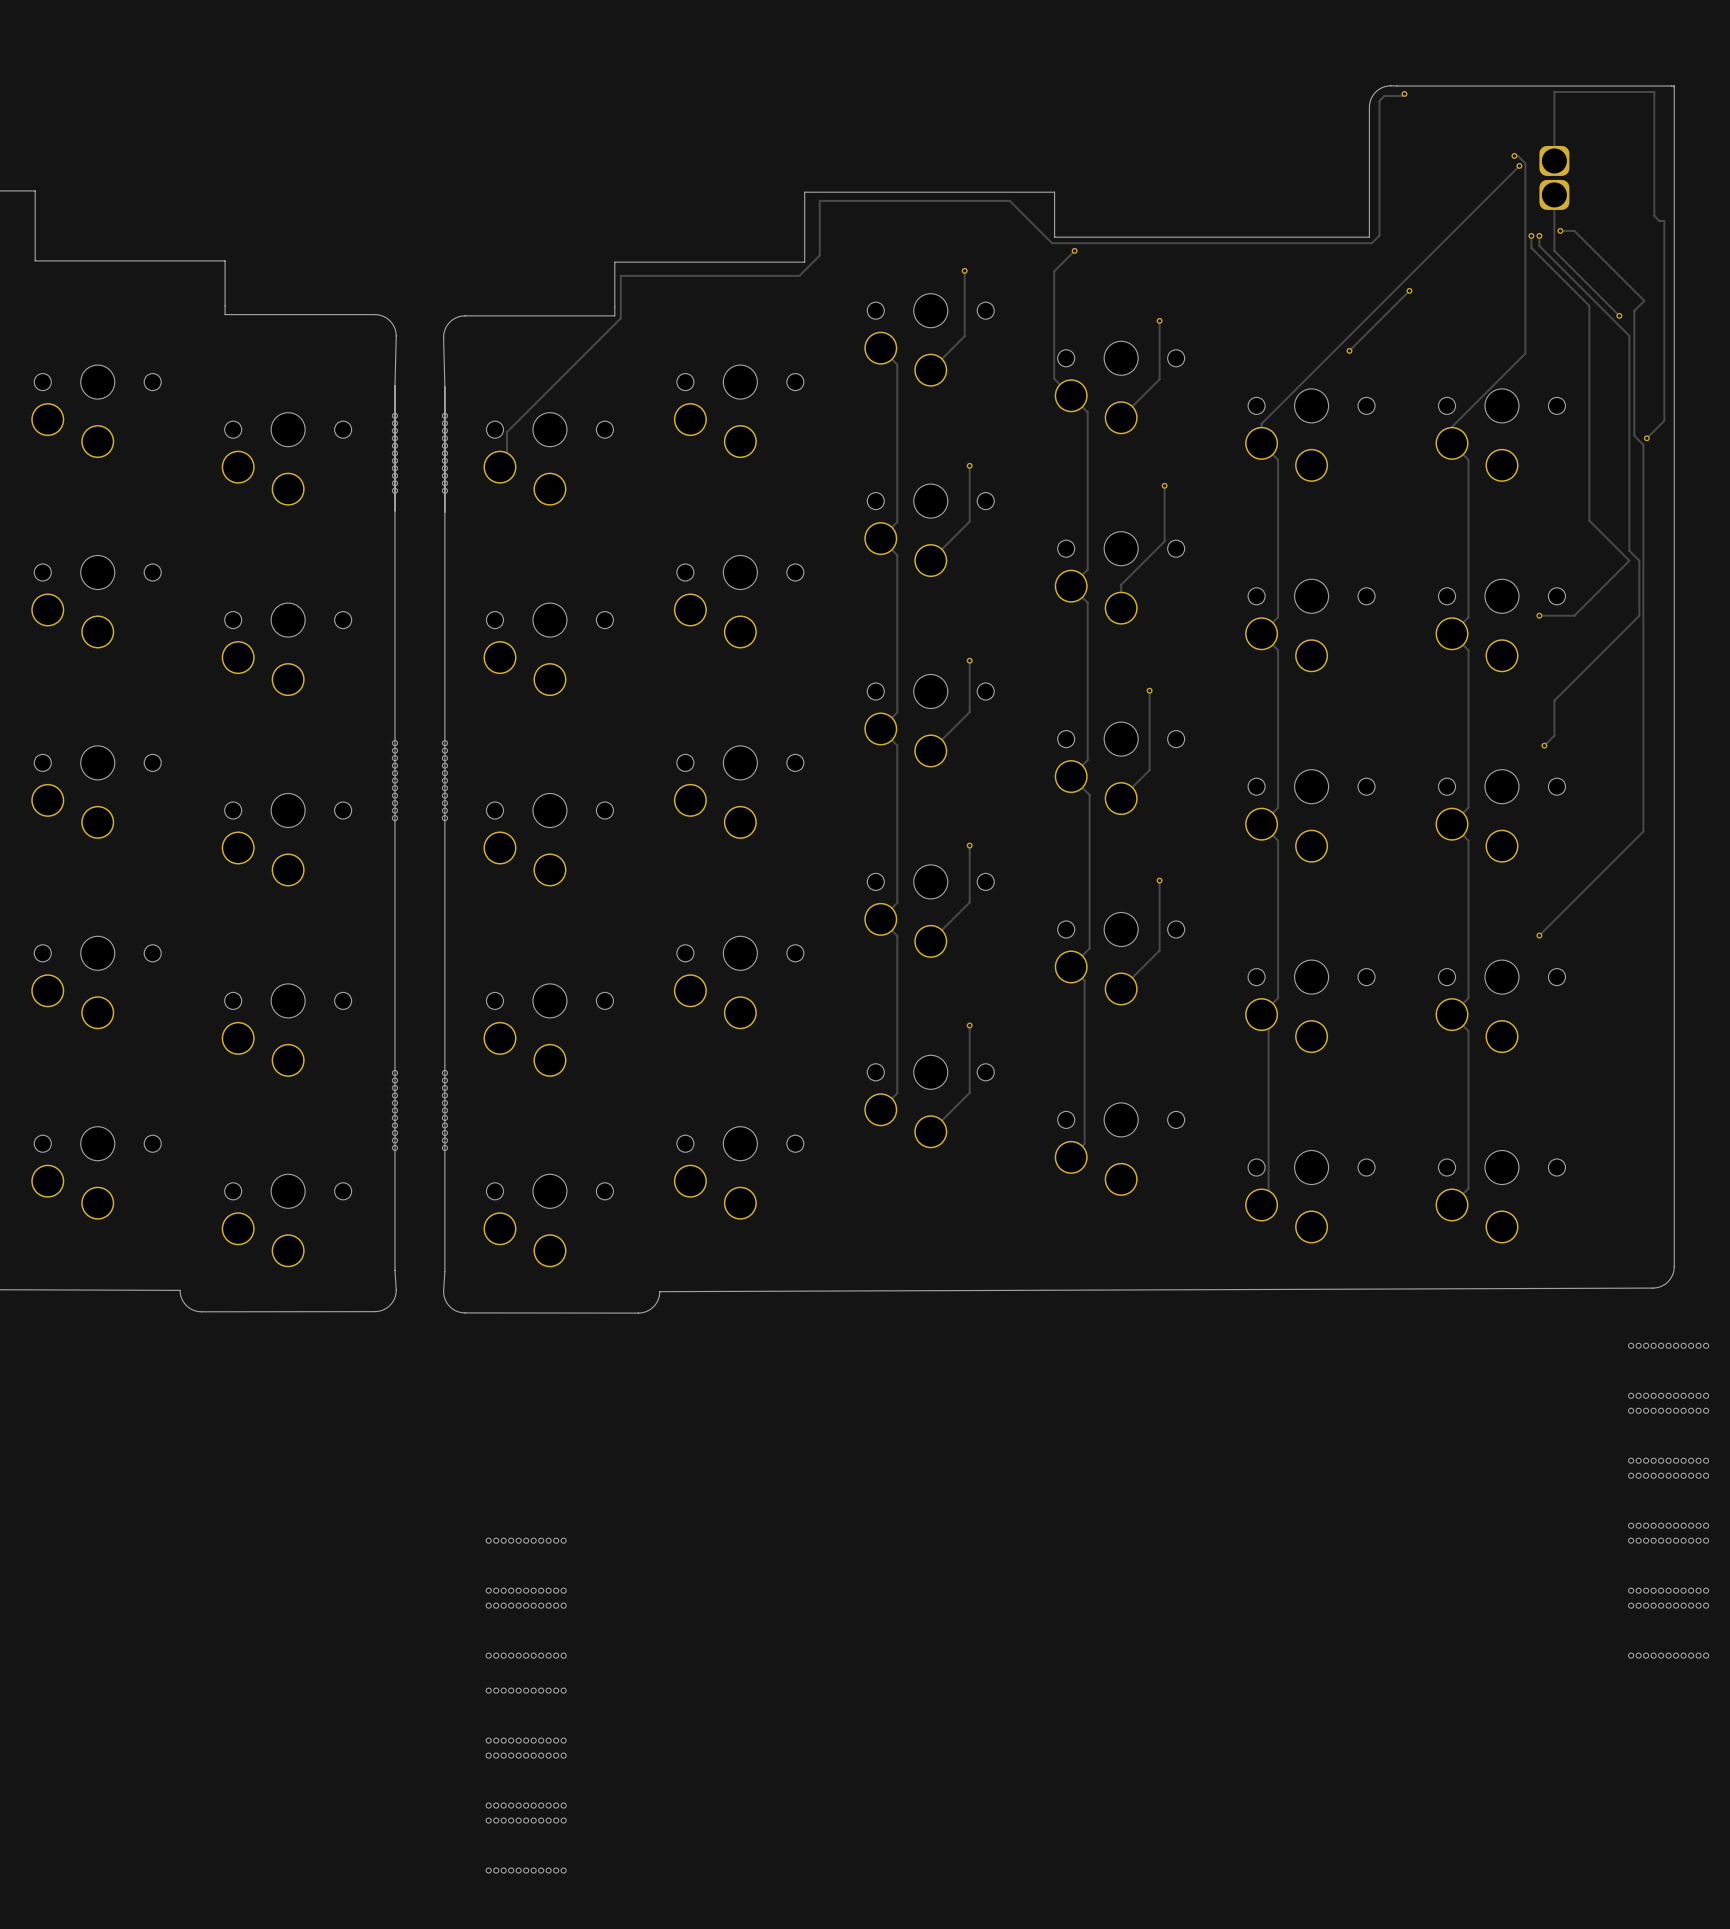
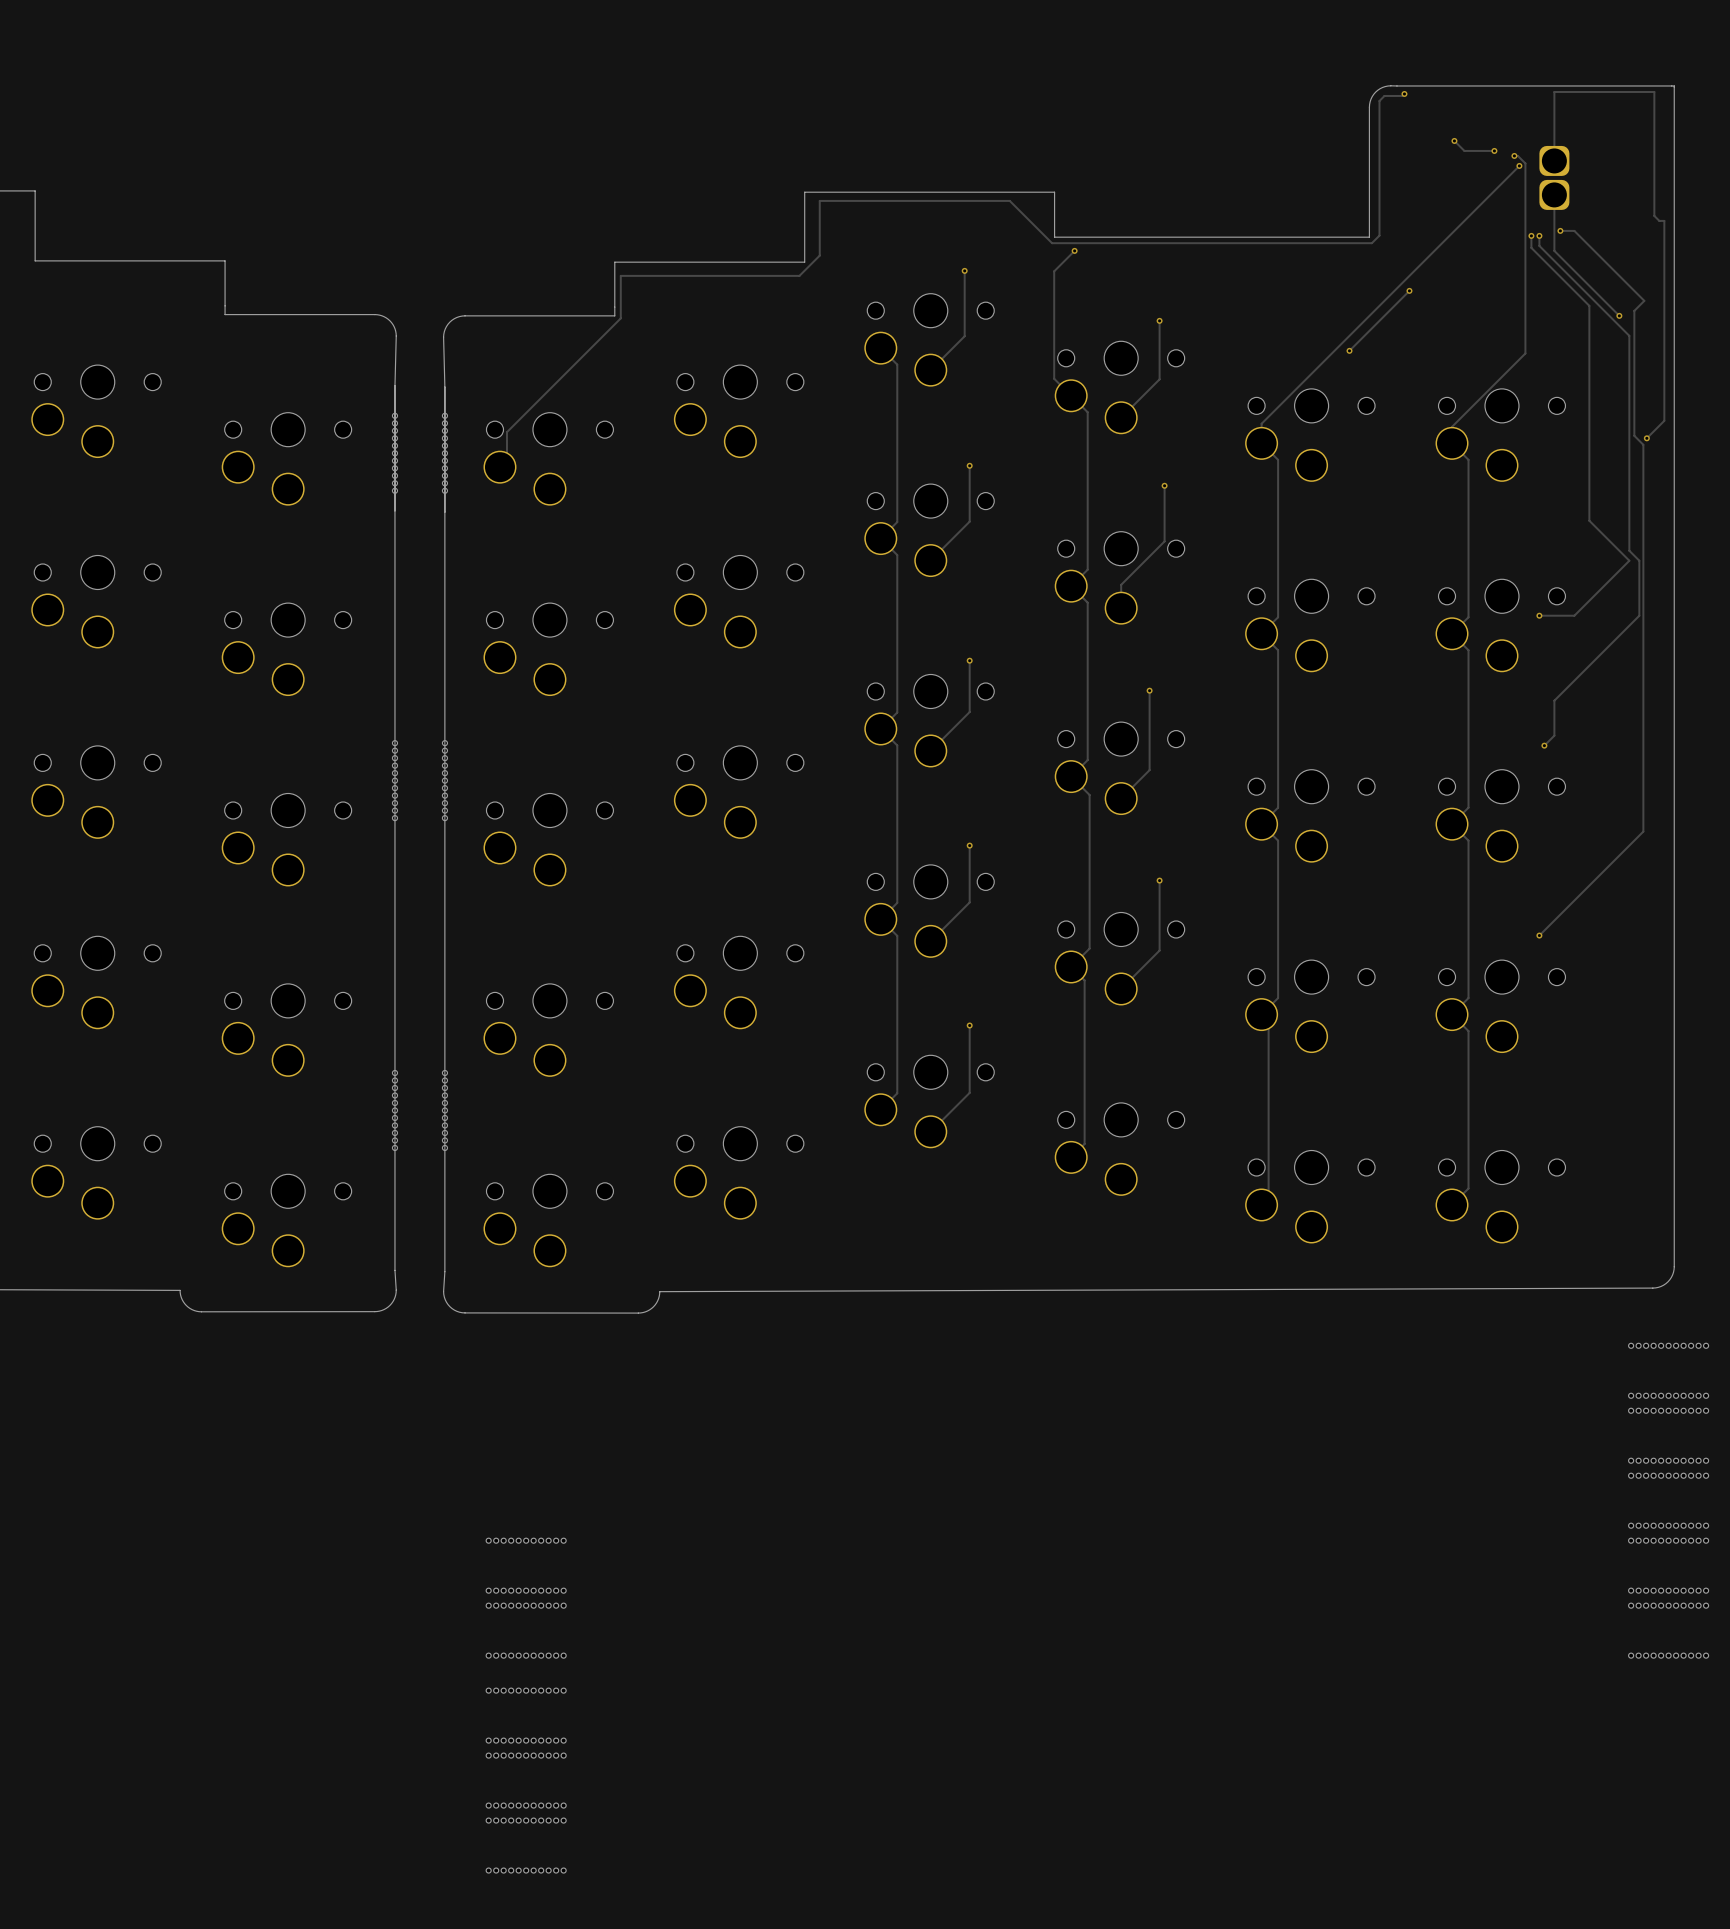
track: none -> (1454, 140) (1464, 150) (1494, 150)
via: none -> (1454, 140)
via: none -> (1494, 150)

